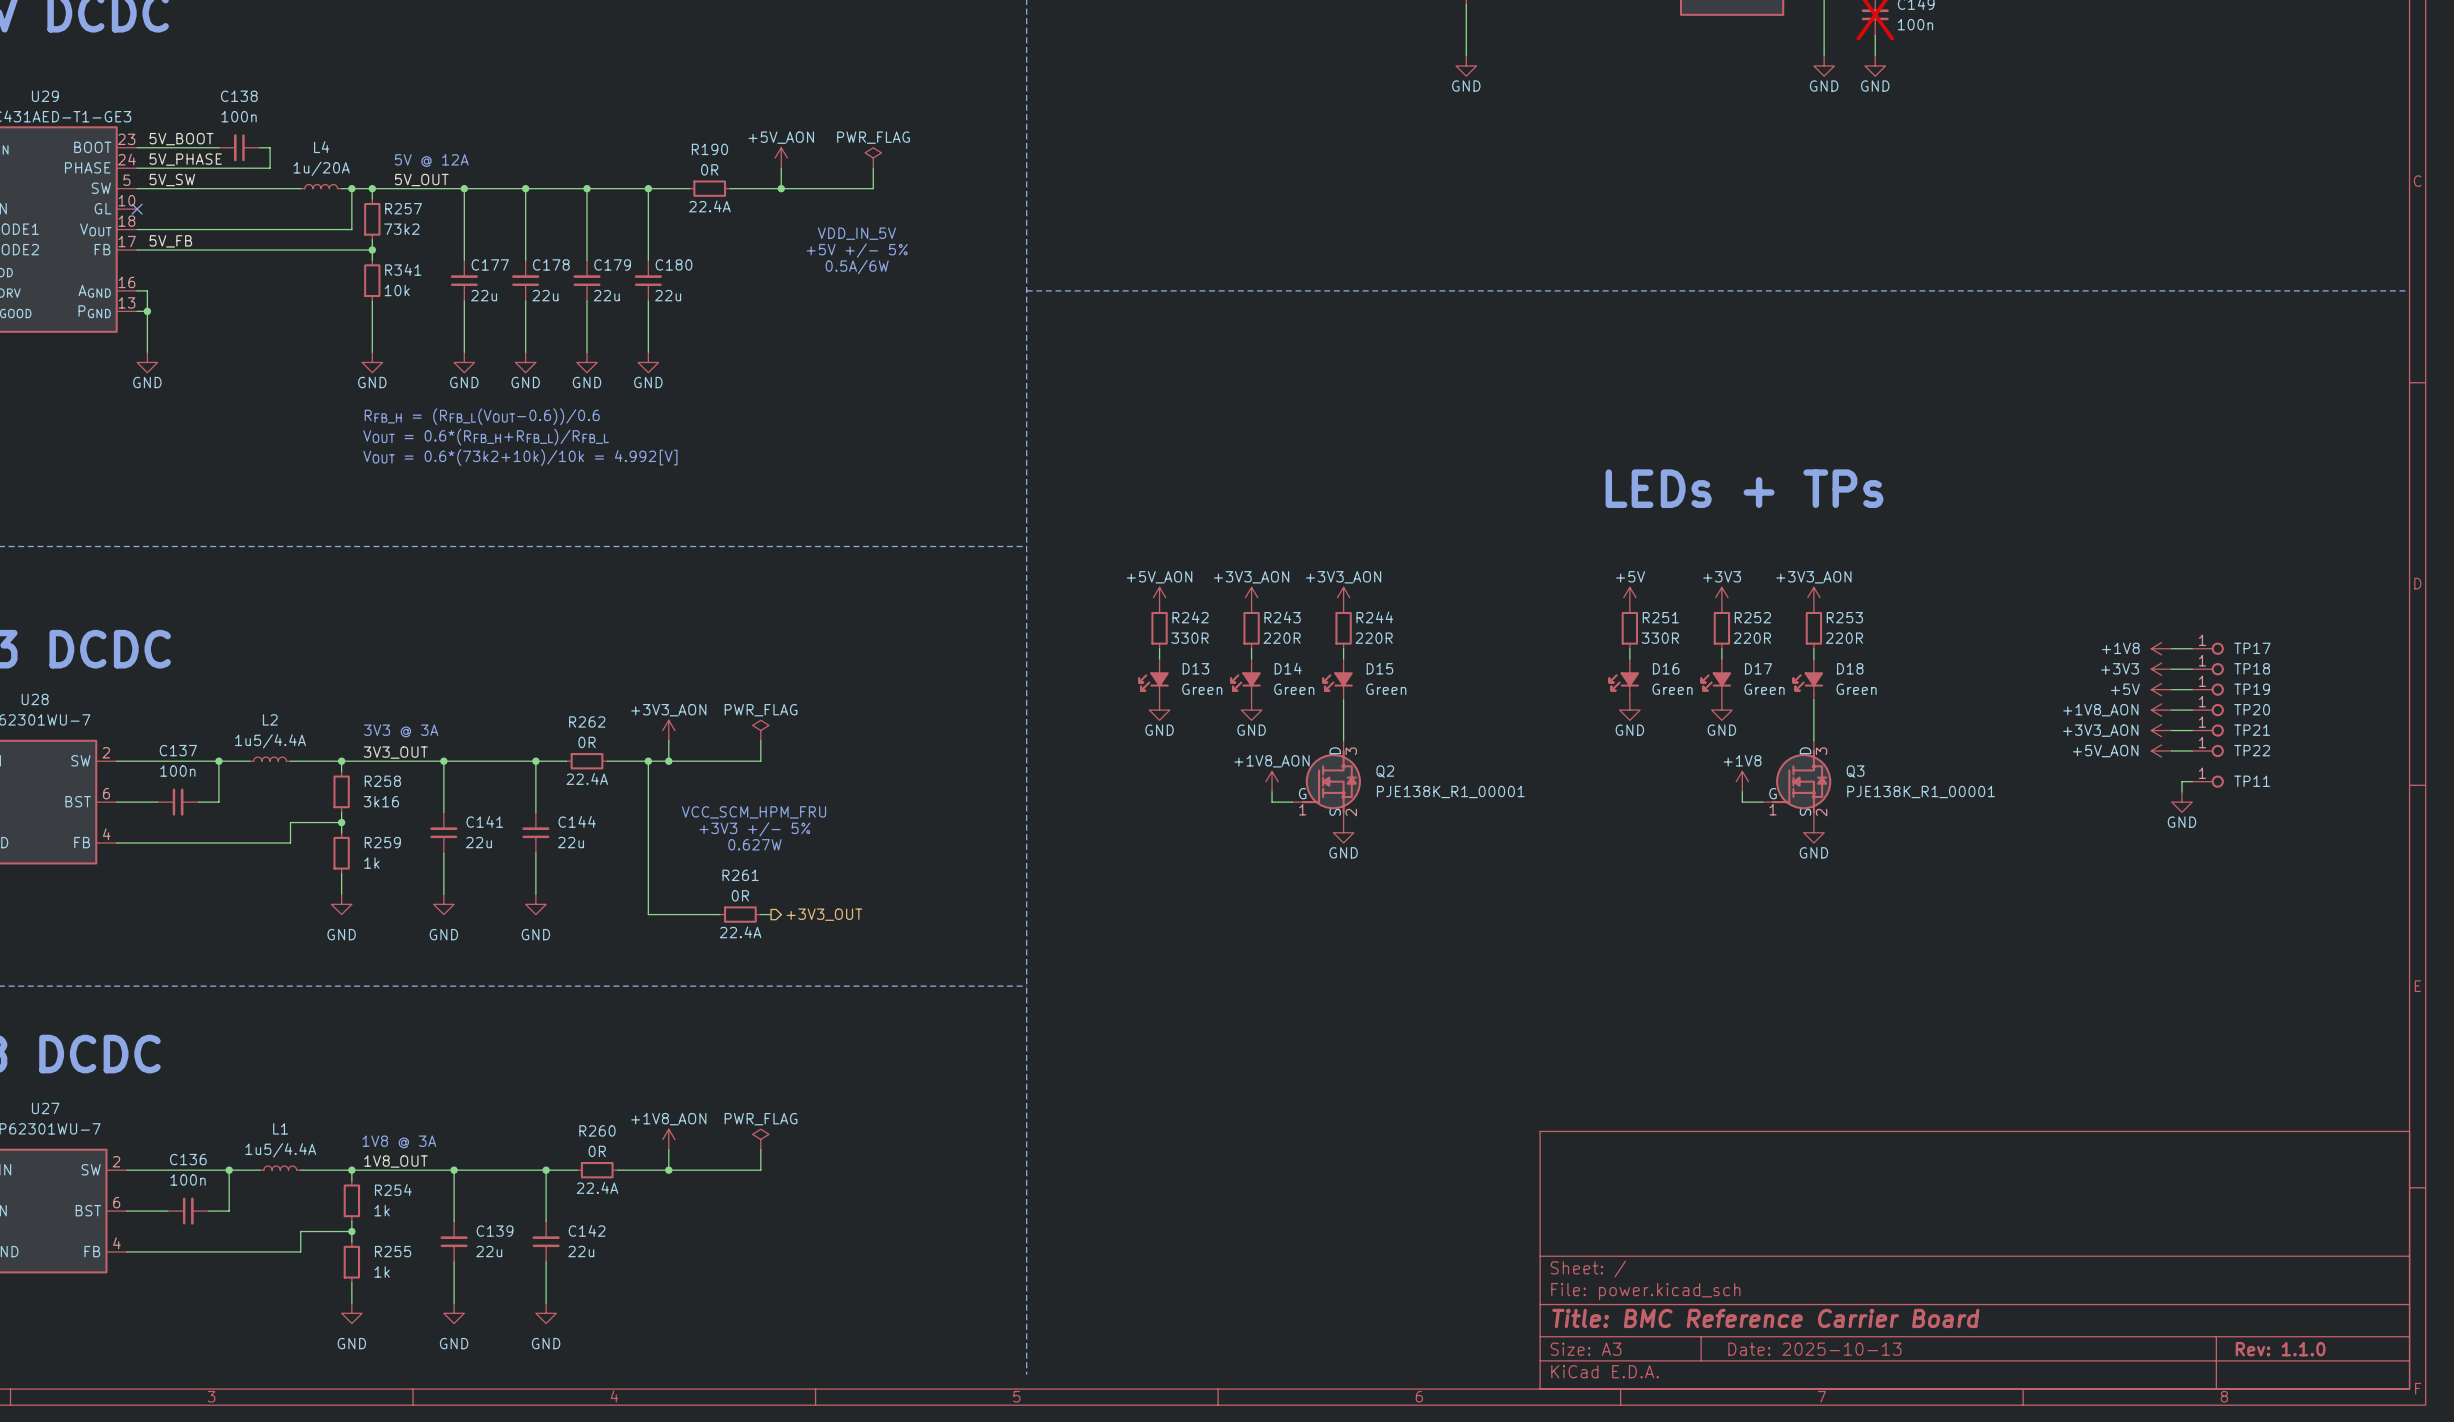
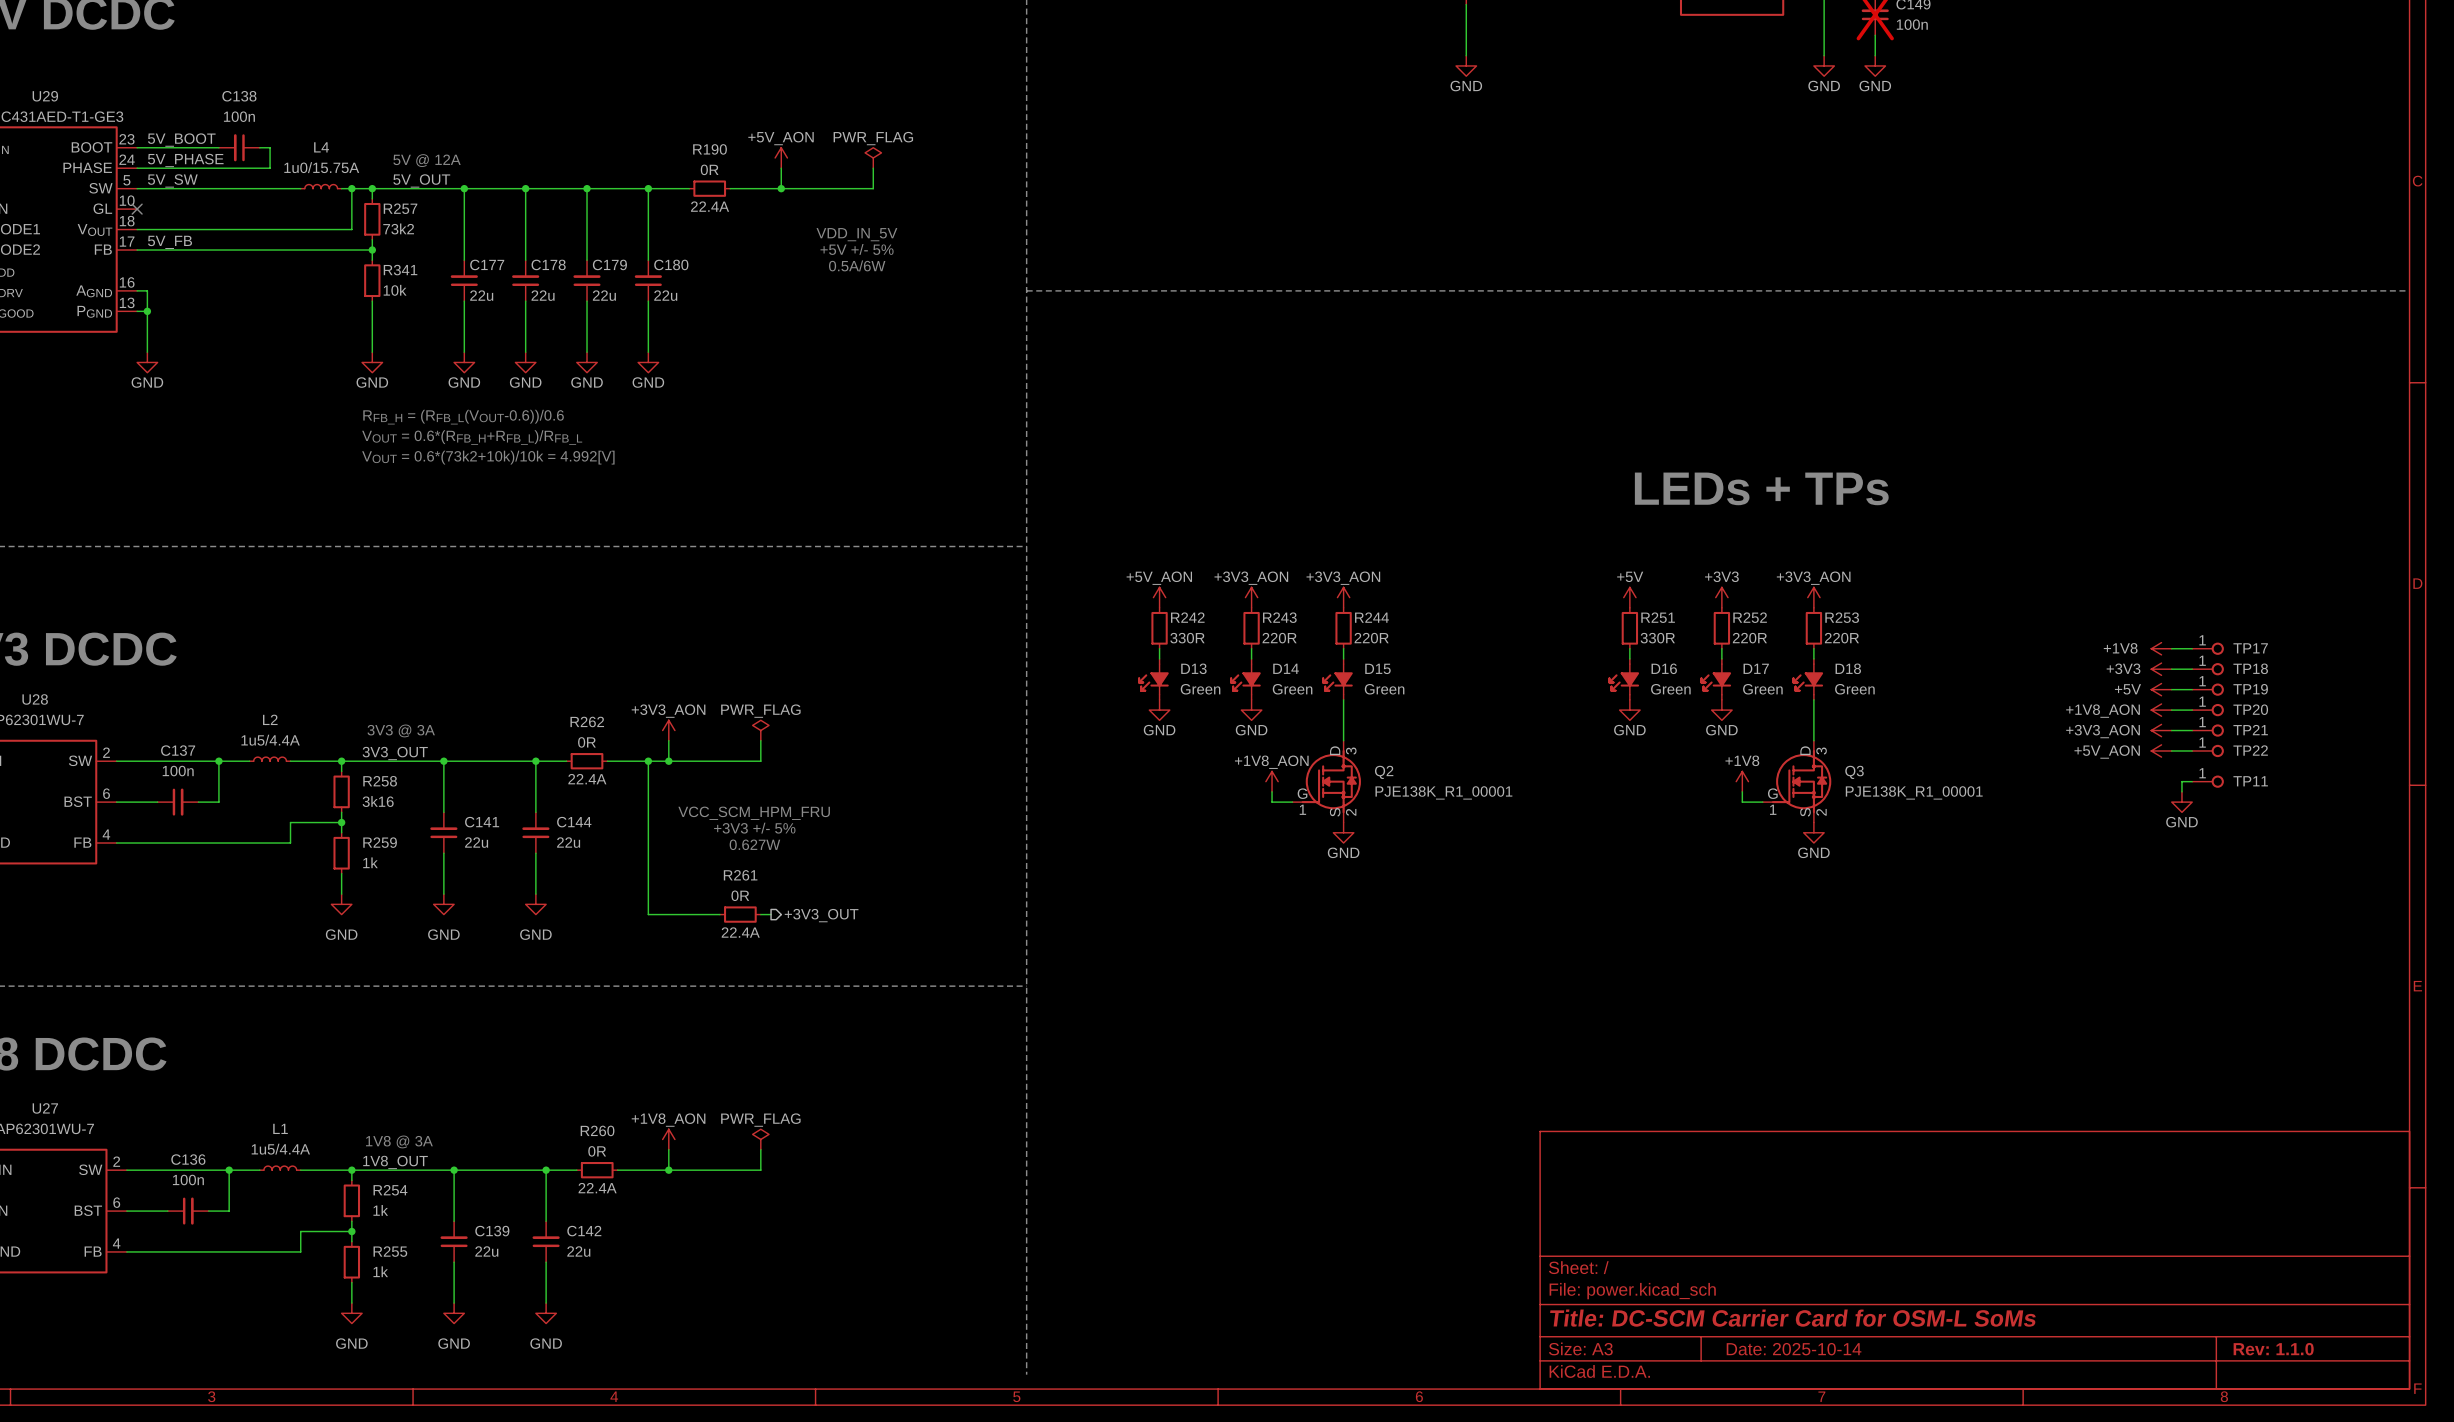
L4 text: 1u/20A (321, 168) -> 1u0/15.75A (321, 167)
title block: Title: BMC Reference Carrier Board (1765, 1318) -> Title: DC-SCM Carrier Card for OSM-L SoMs (1792, 1318)
title block: Date: 2025-10-13 (1814, 1349) -> Date: 2025-10-14 (1794, 1349)

